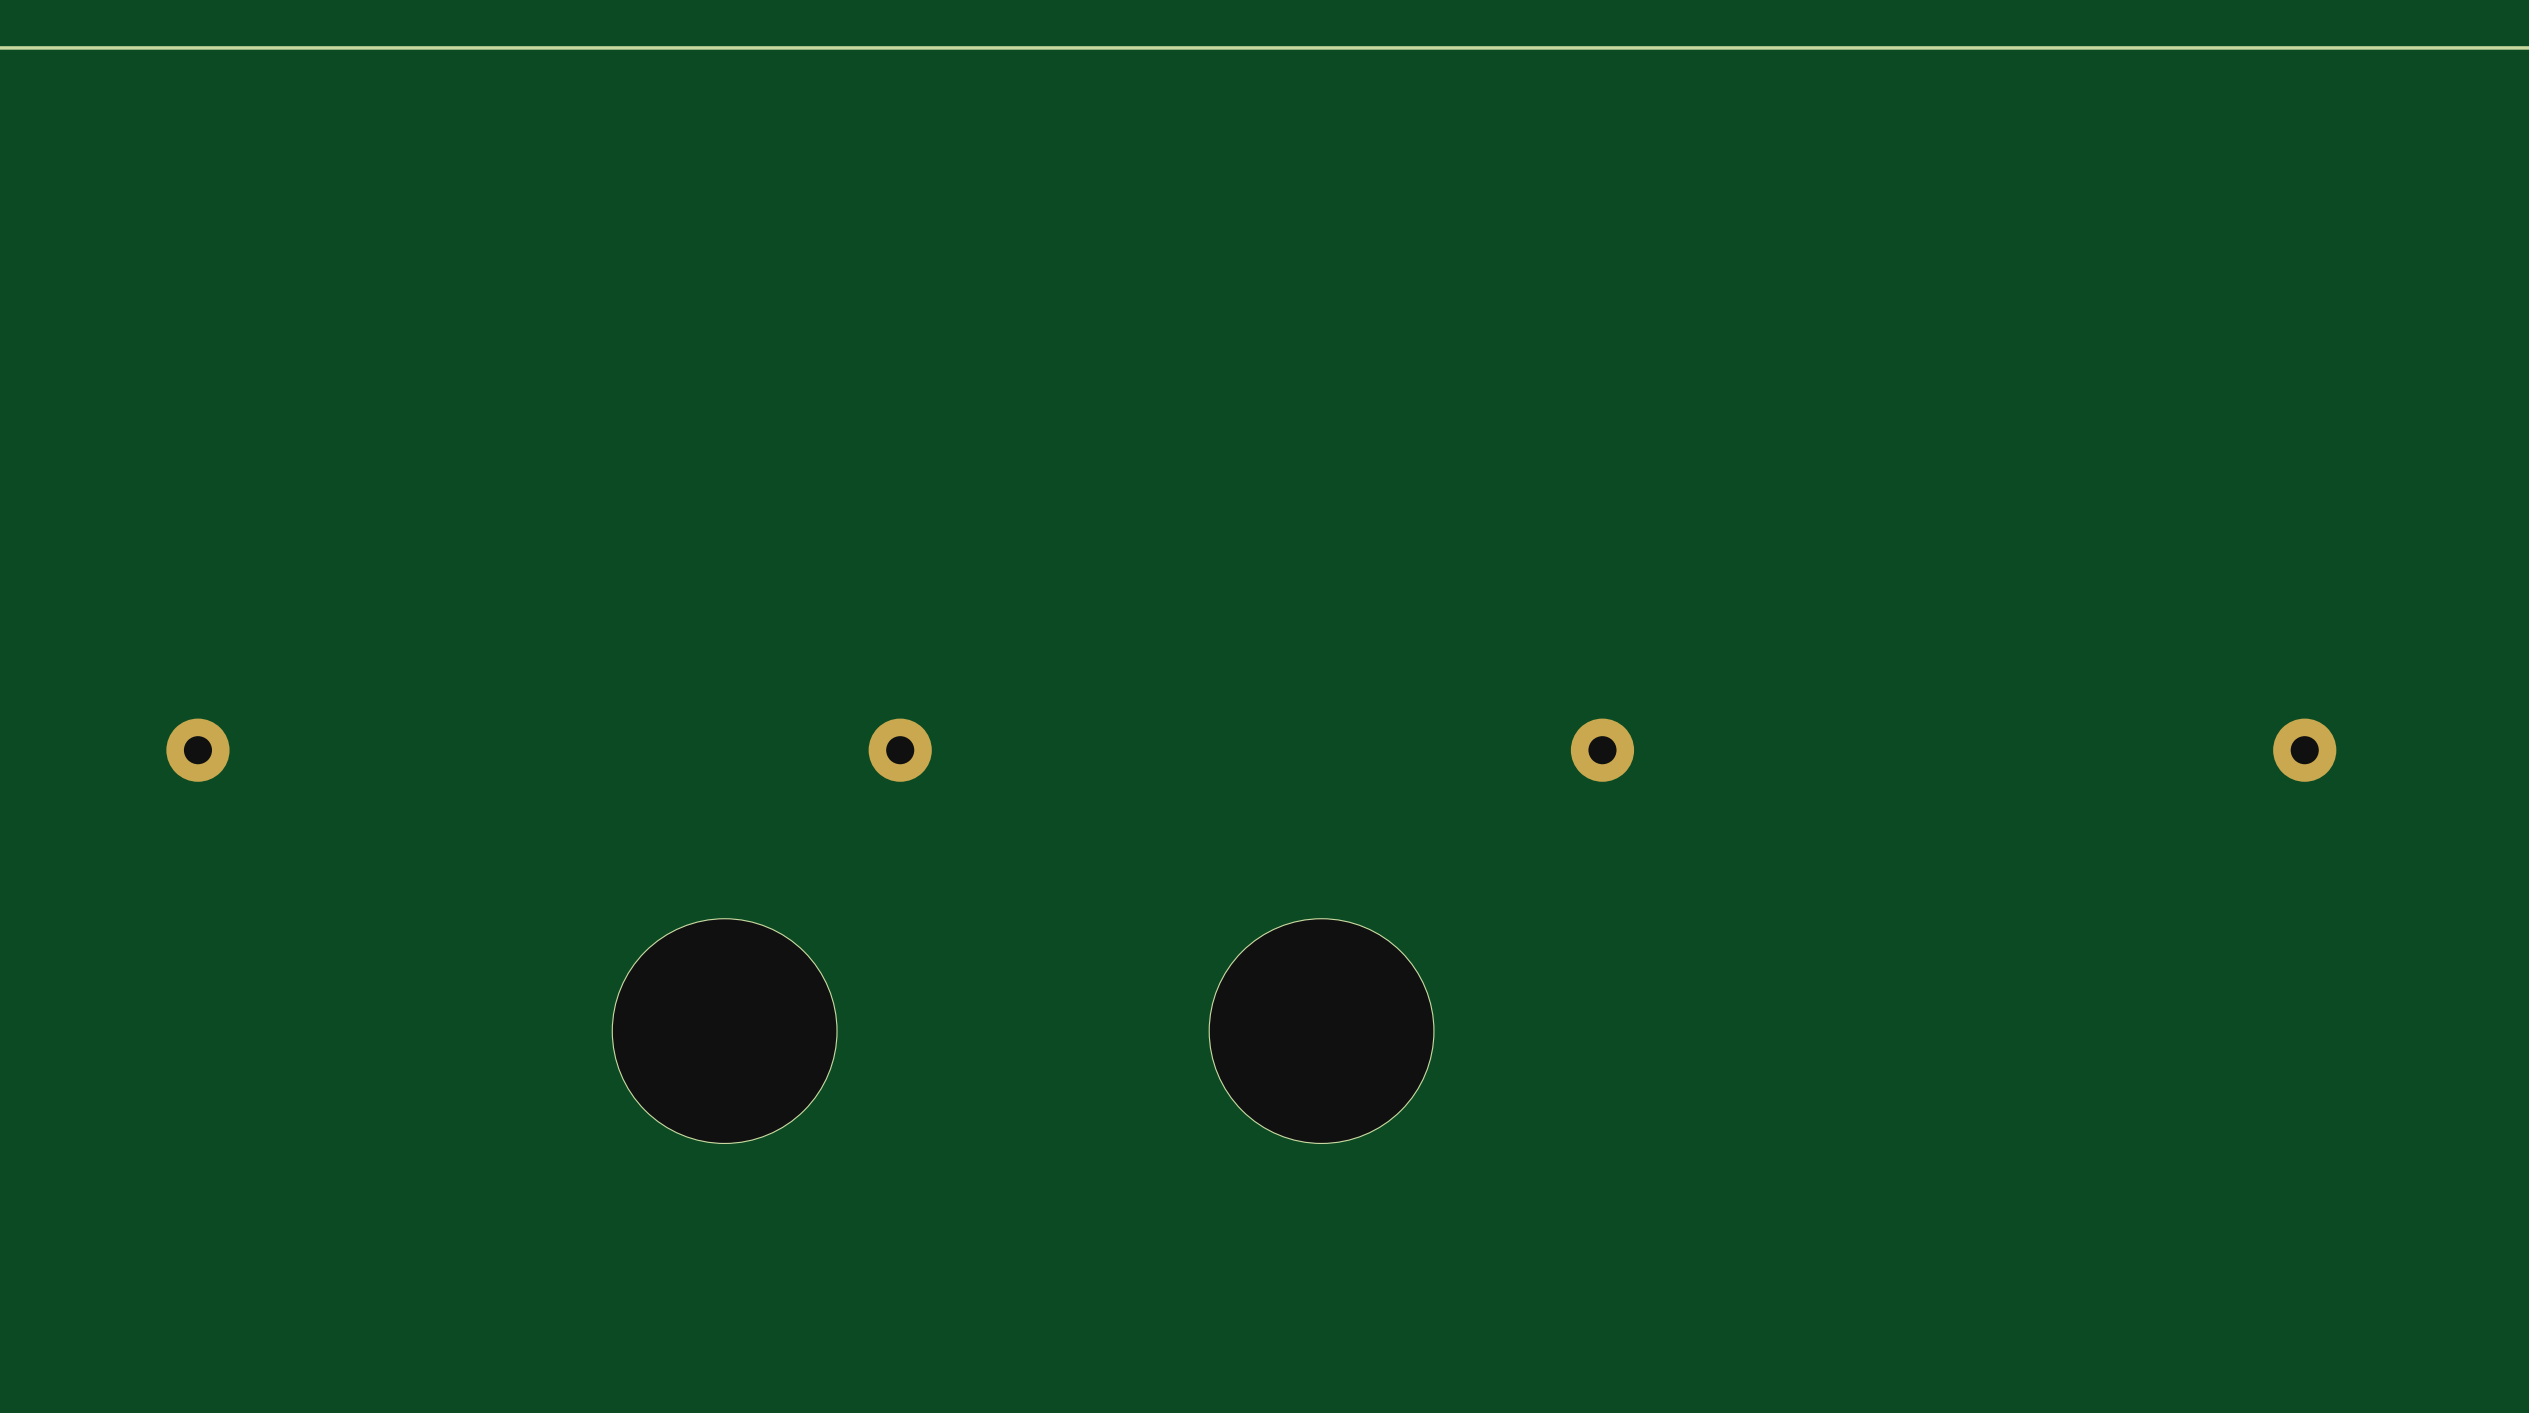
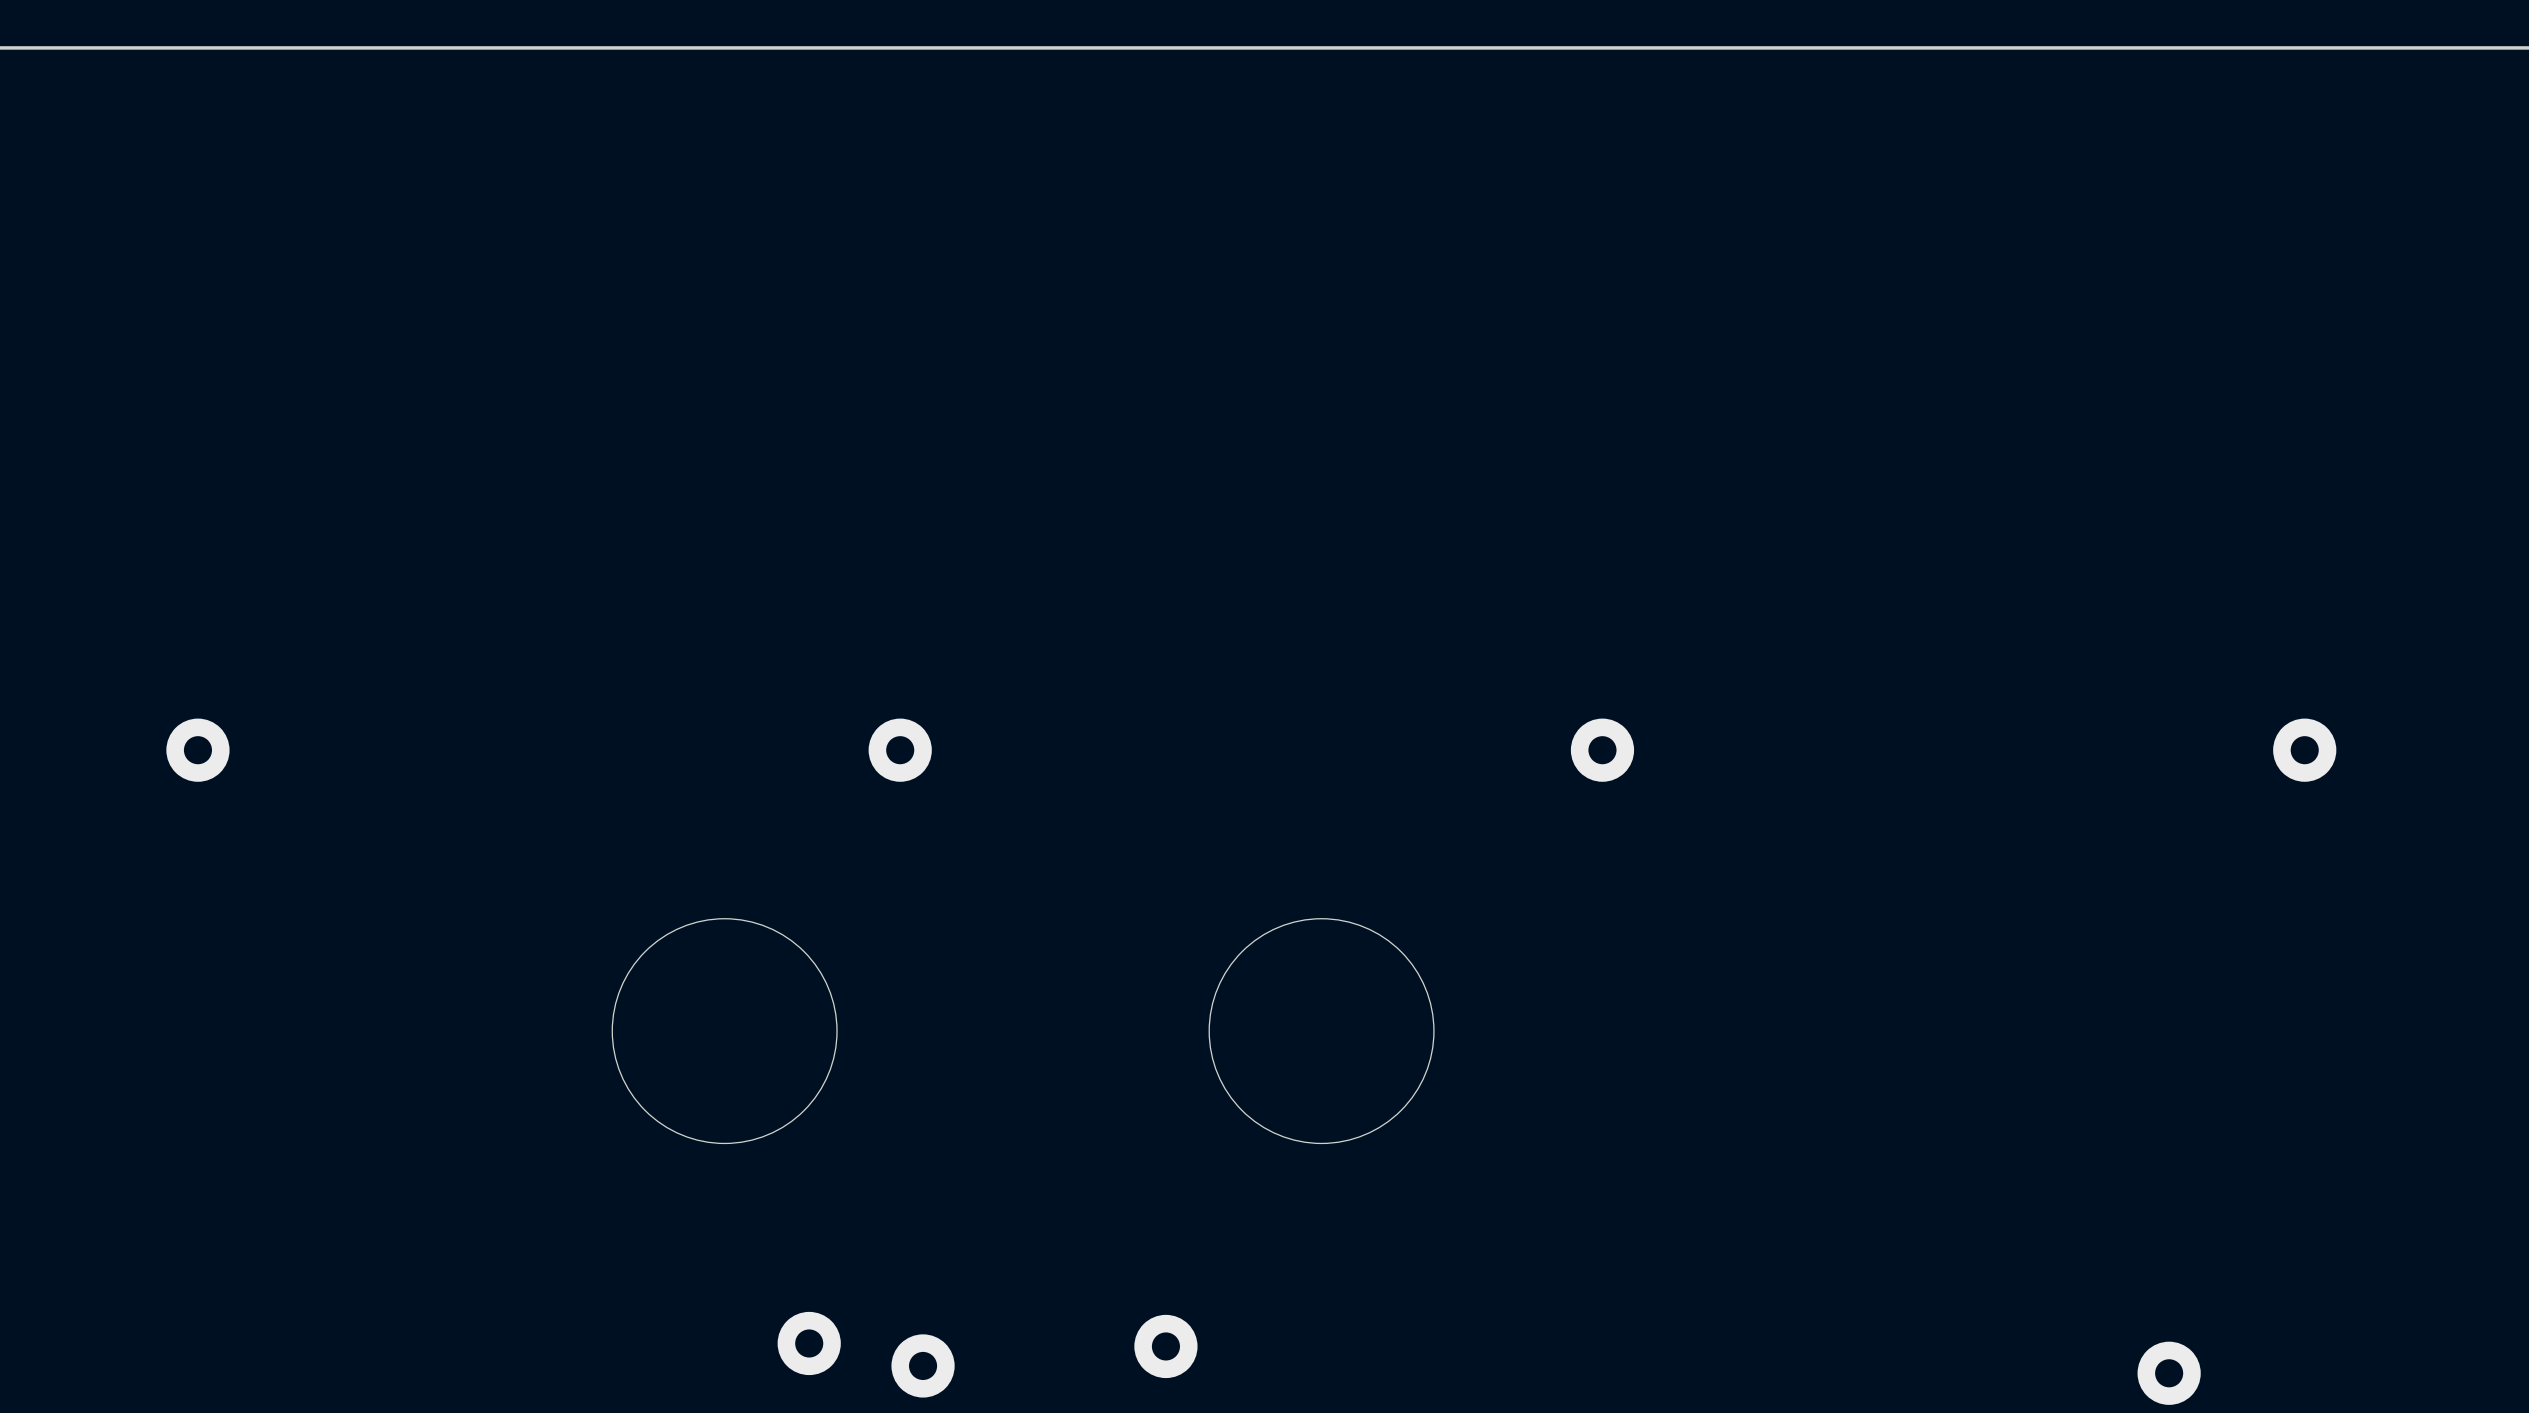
via: none -> (809, 1343)
via: none -> (1165, 1346)
via: none -> (923, 1365)
via: none -> (2169, 1373)

